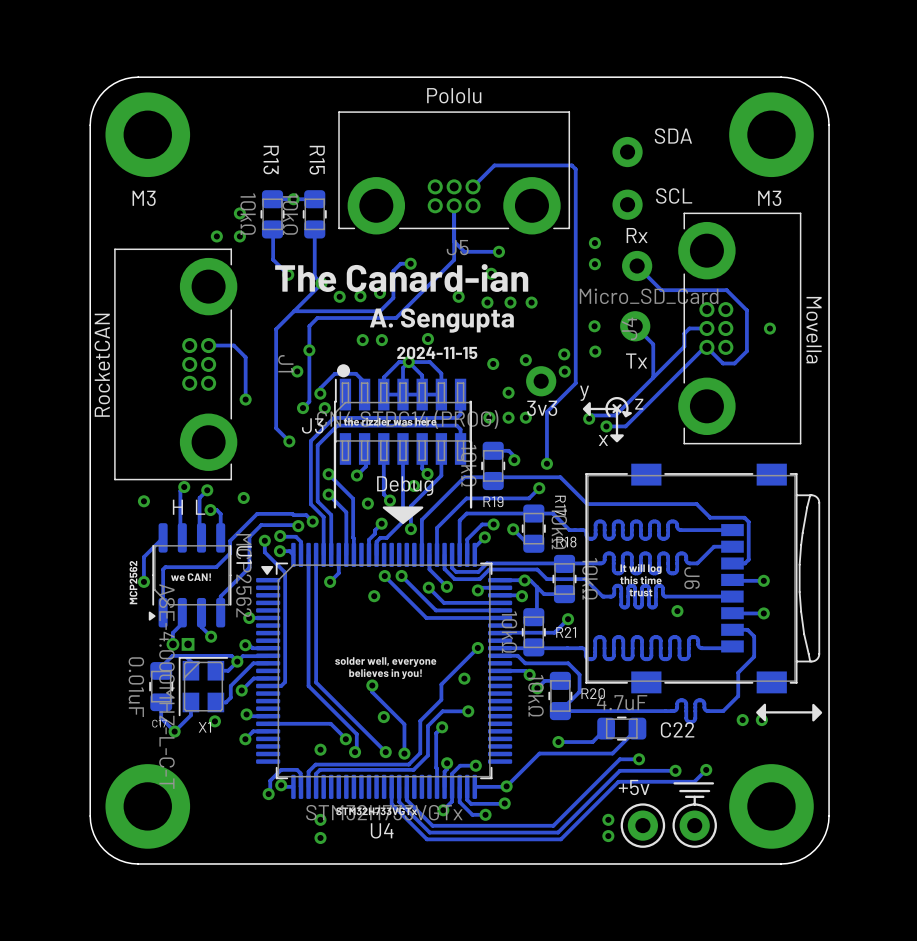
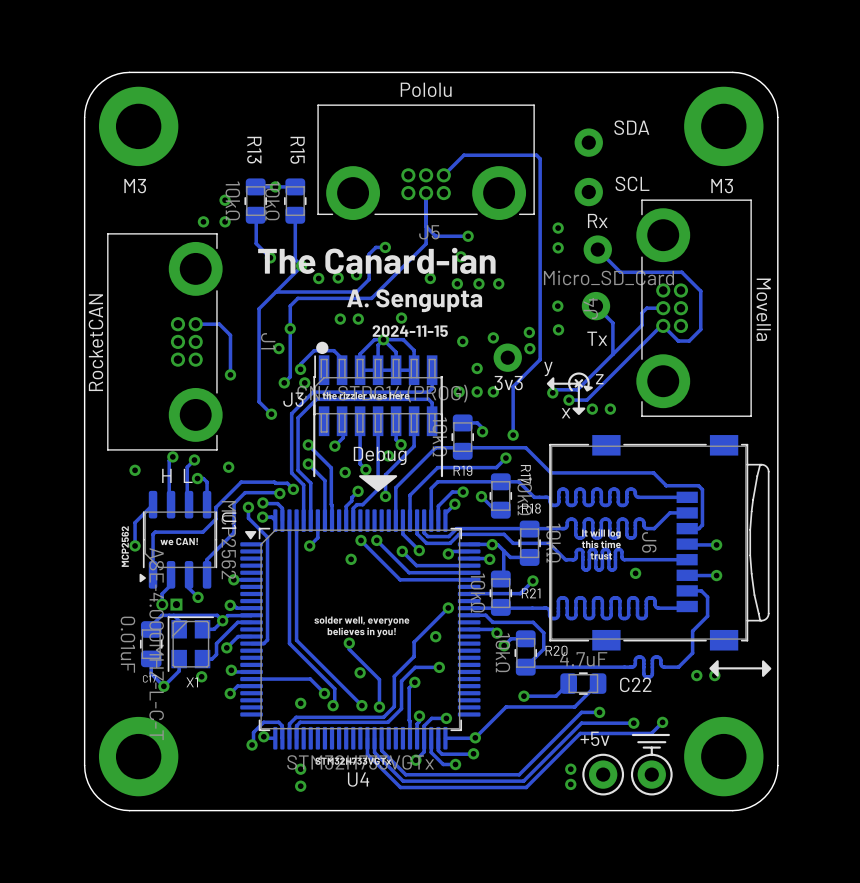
via: (769, 328) -> none
via: none -> (592, 409)
via: none -> (610, 409)

